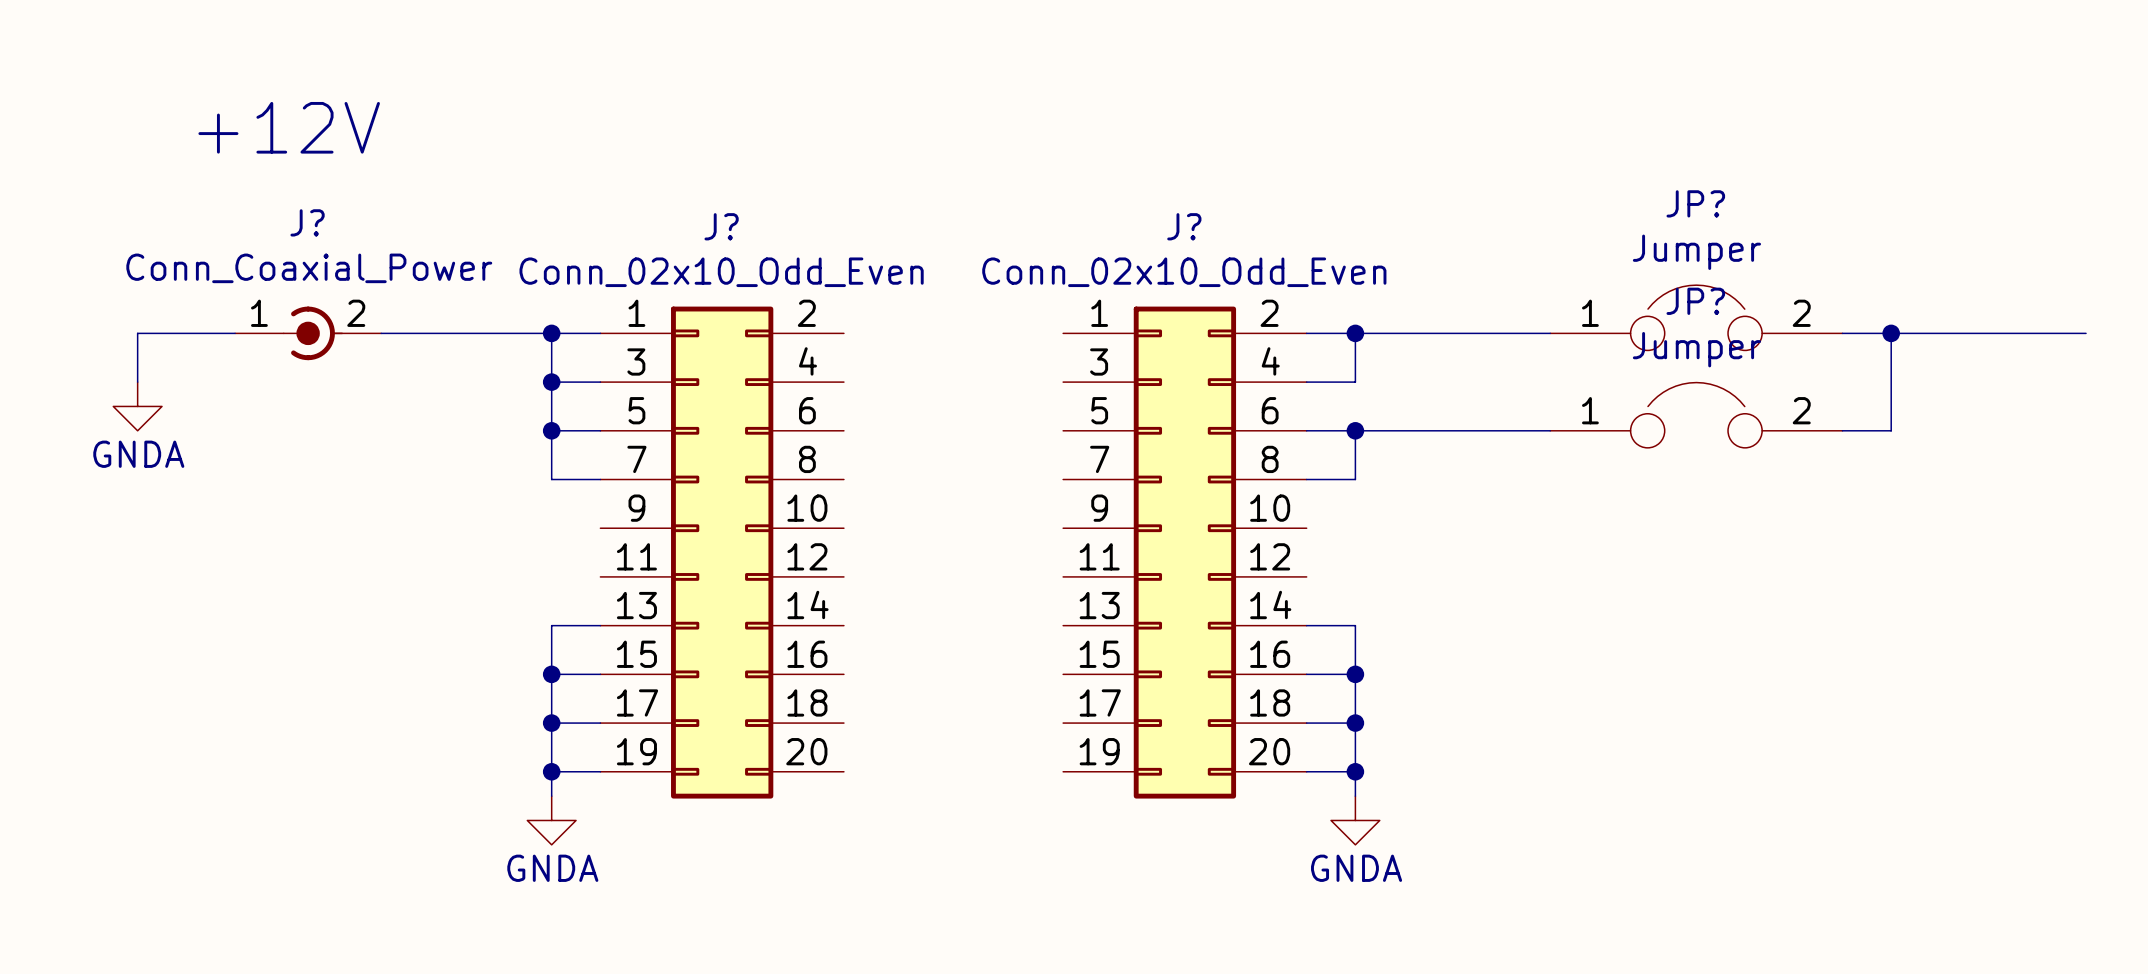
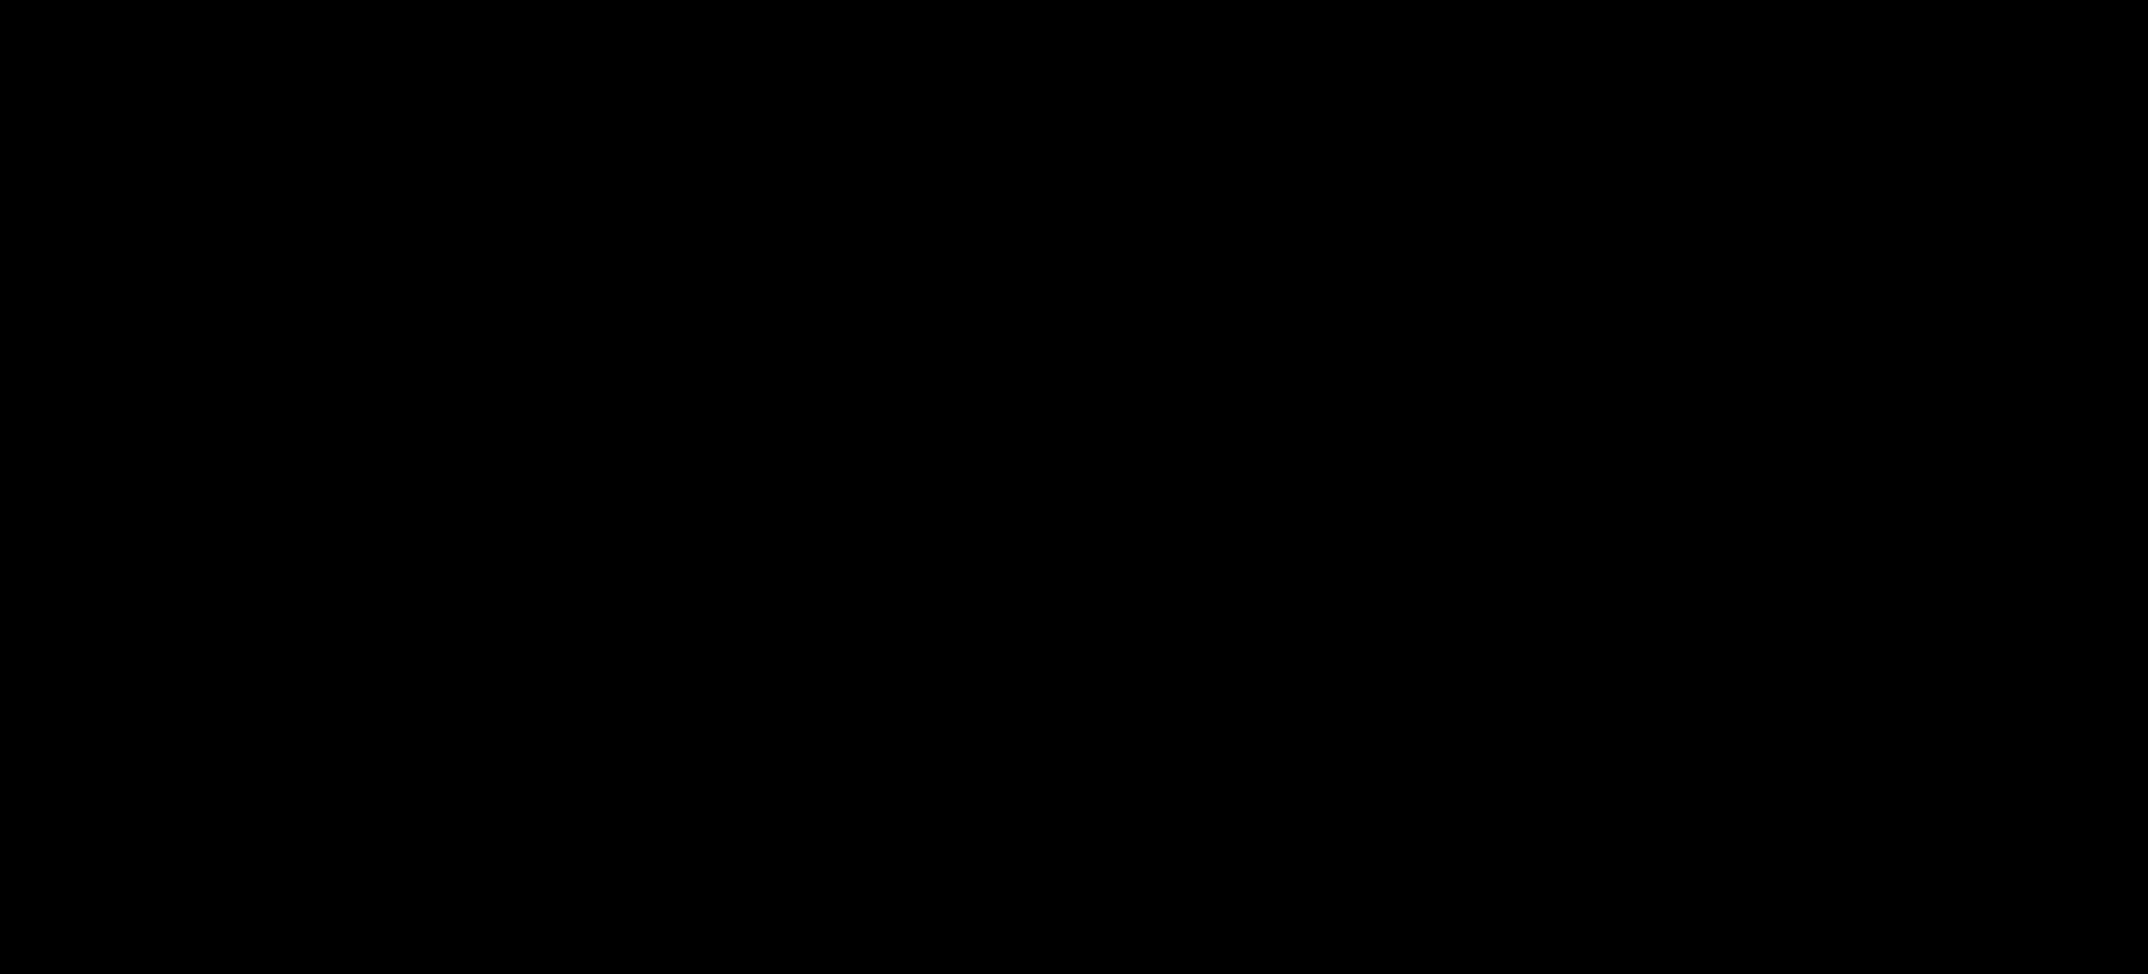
text: +12V (289, 127) -> none
JP?: Jumper (1696, 317) -> none
wire: (235, 333) (137, 333) (137, 382) -> none
J?: Conn_Coaxial_Power (308, 333) -> none
wire: (381, 333) (600, 333) -> none
wire: (551, 333) (551, 479) (600, 479) -> none
junction: (551, 333) -> none
wire: (1306, 333) (1550, 333) -> none
wire: (1355, 333) (1355, 382) (1306, 382) -> none
junction: (1355, 333) -> none
wire: (1842, 333) (2086, 333) -> none
wire: (1891, 333) (1891, 430) (1842, 430) -> none
junction: (1891, 333) -> none
wire: (551, 382) (600, 382) -> none
junction: (551, 382) -> none
power symbol: GNDA (137, 406) -> none
JP?: Jumper (1696, 415) -> none
wire: (551, 430) (600, 430) -> none
junction: (551, 430) -> none
wire: (1306, 430) (1550, 430) -> none
wire: (1355, 430) (1355, 479) (1306, 479) -> none
junction: (1355, 430) -> none
J?: Conn_02x10_Odd_Even (722, 552) -> none
J?: Conn_02x10_Odd_Even (1184, 552) -> none
wire: (600, 625) (551, 625) (551, 796) -> none
wire: (1306, 625) (1355, 625) (1355, 796) -> none
wire: (551, 674) (600, 674) -> none
junction: (551, 674) -> none
wire: (1306, 674) (1355, 674) -> none
junction: (1355, 674) -> none
wire: (551, 723) (600, 723) -> none
junction: (551, 723) -> none
wire: (1306, 723) (1355, 723) -> none
junction: (1355, 723) -> none
wire: (551, 771) (600, 771) -> none
junction: (551, 771) -> none
wire: (1306, 771) (1355, 771) -> none
junction: (1355, 771) -> none
power symbol: GNDA (551, 820) -> none
power symbol: GNDA (1355, 820) -> none

